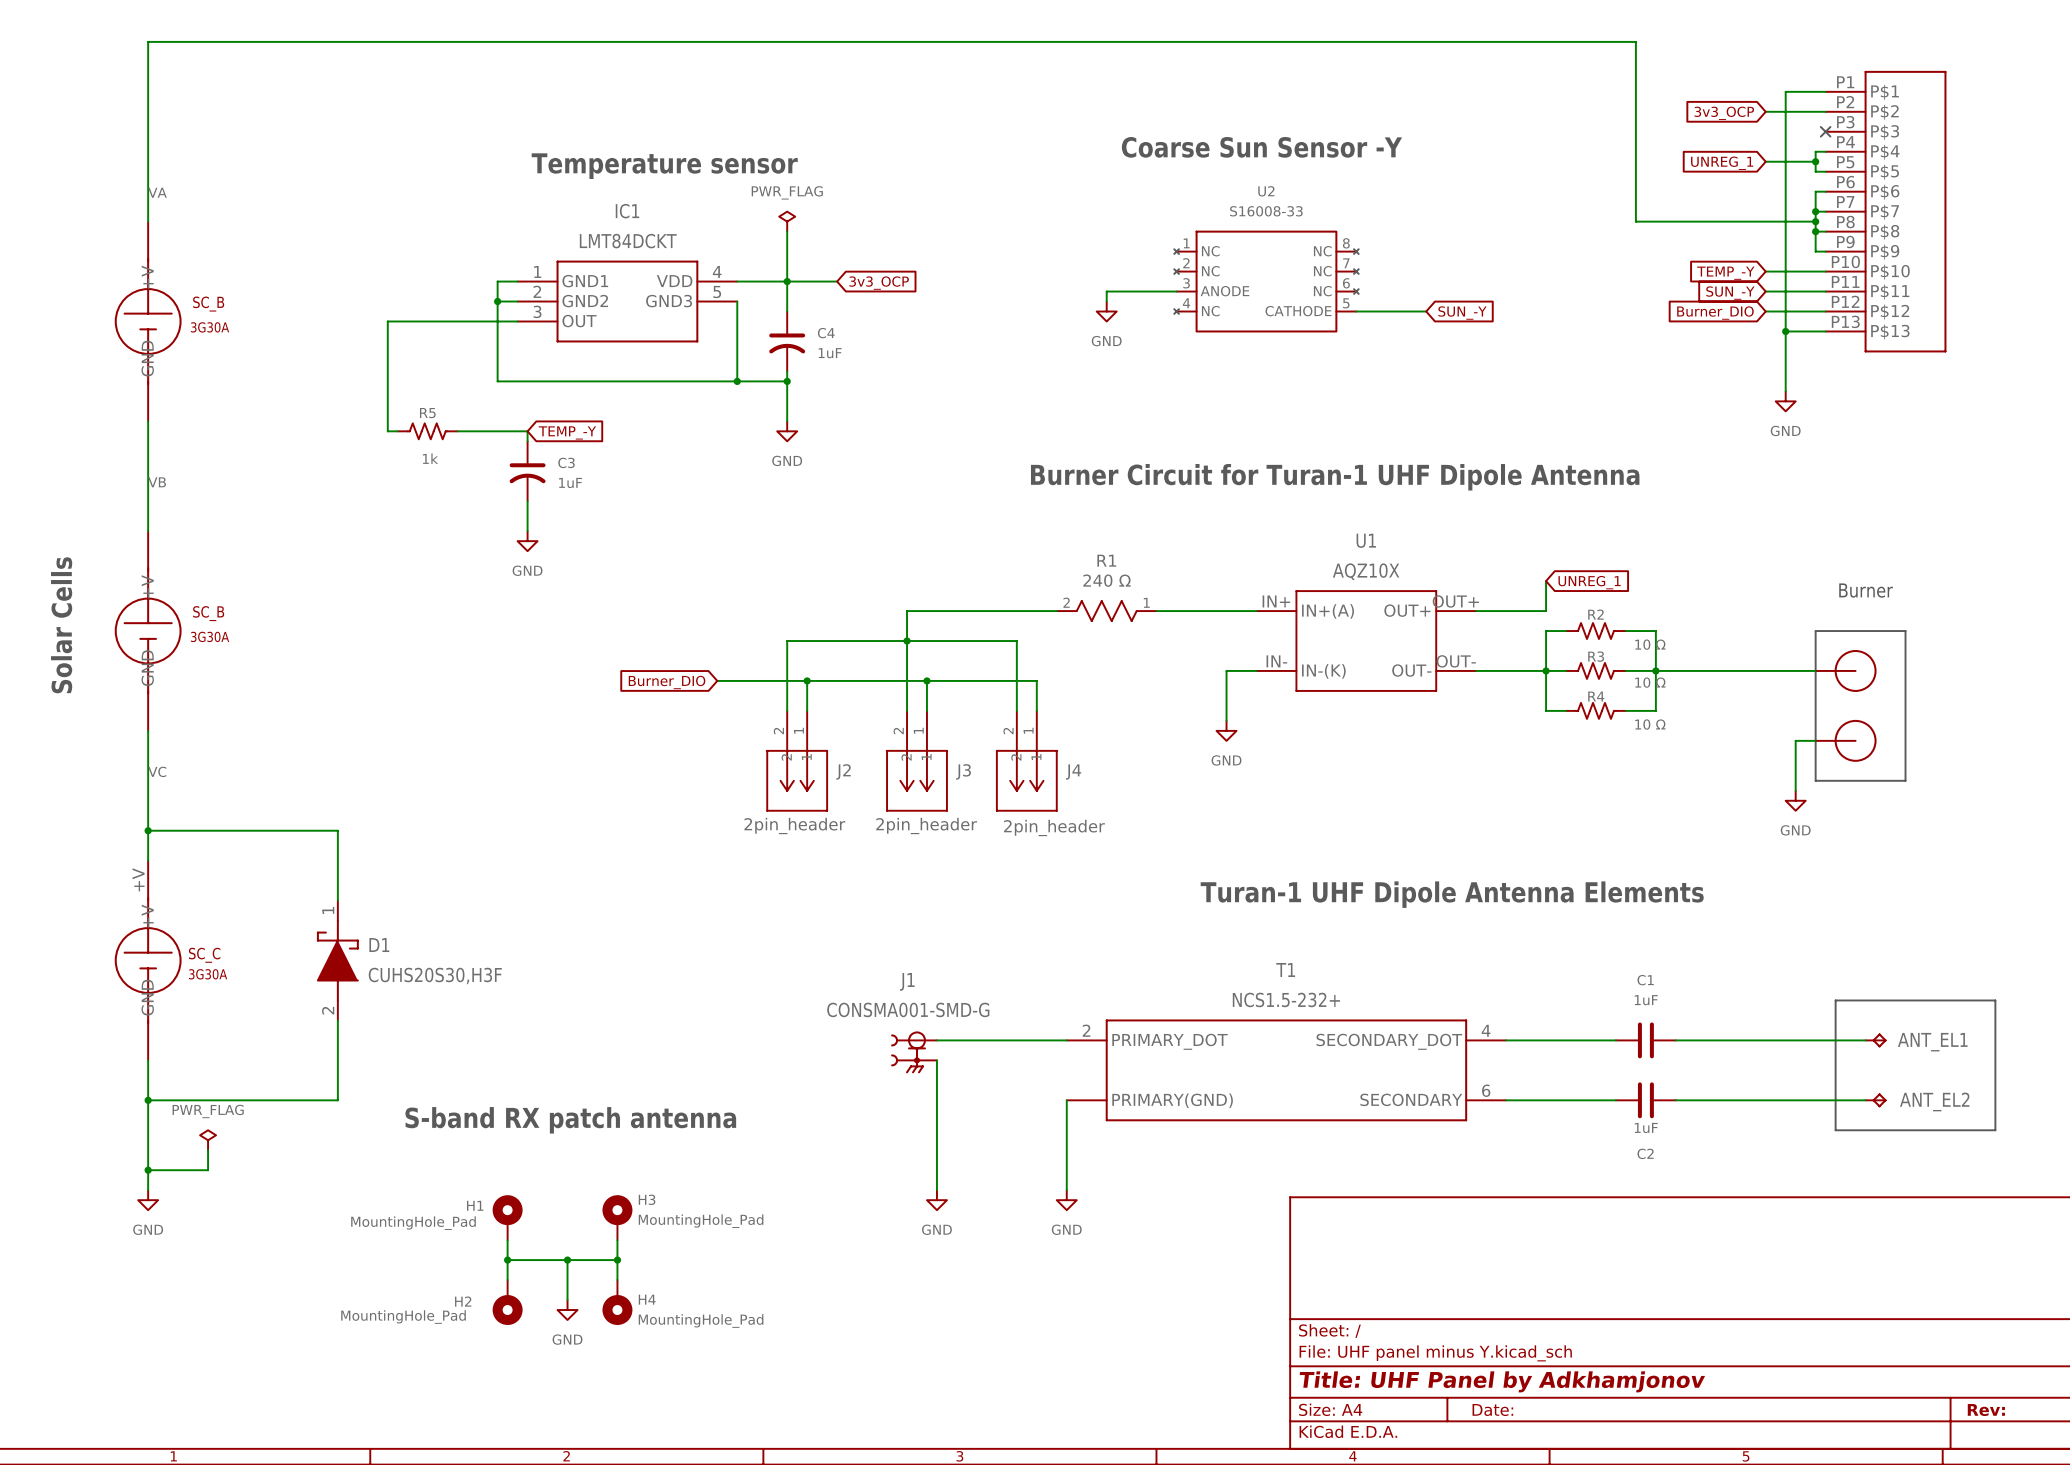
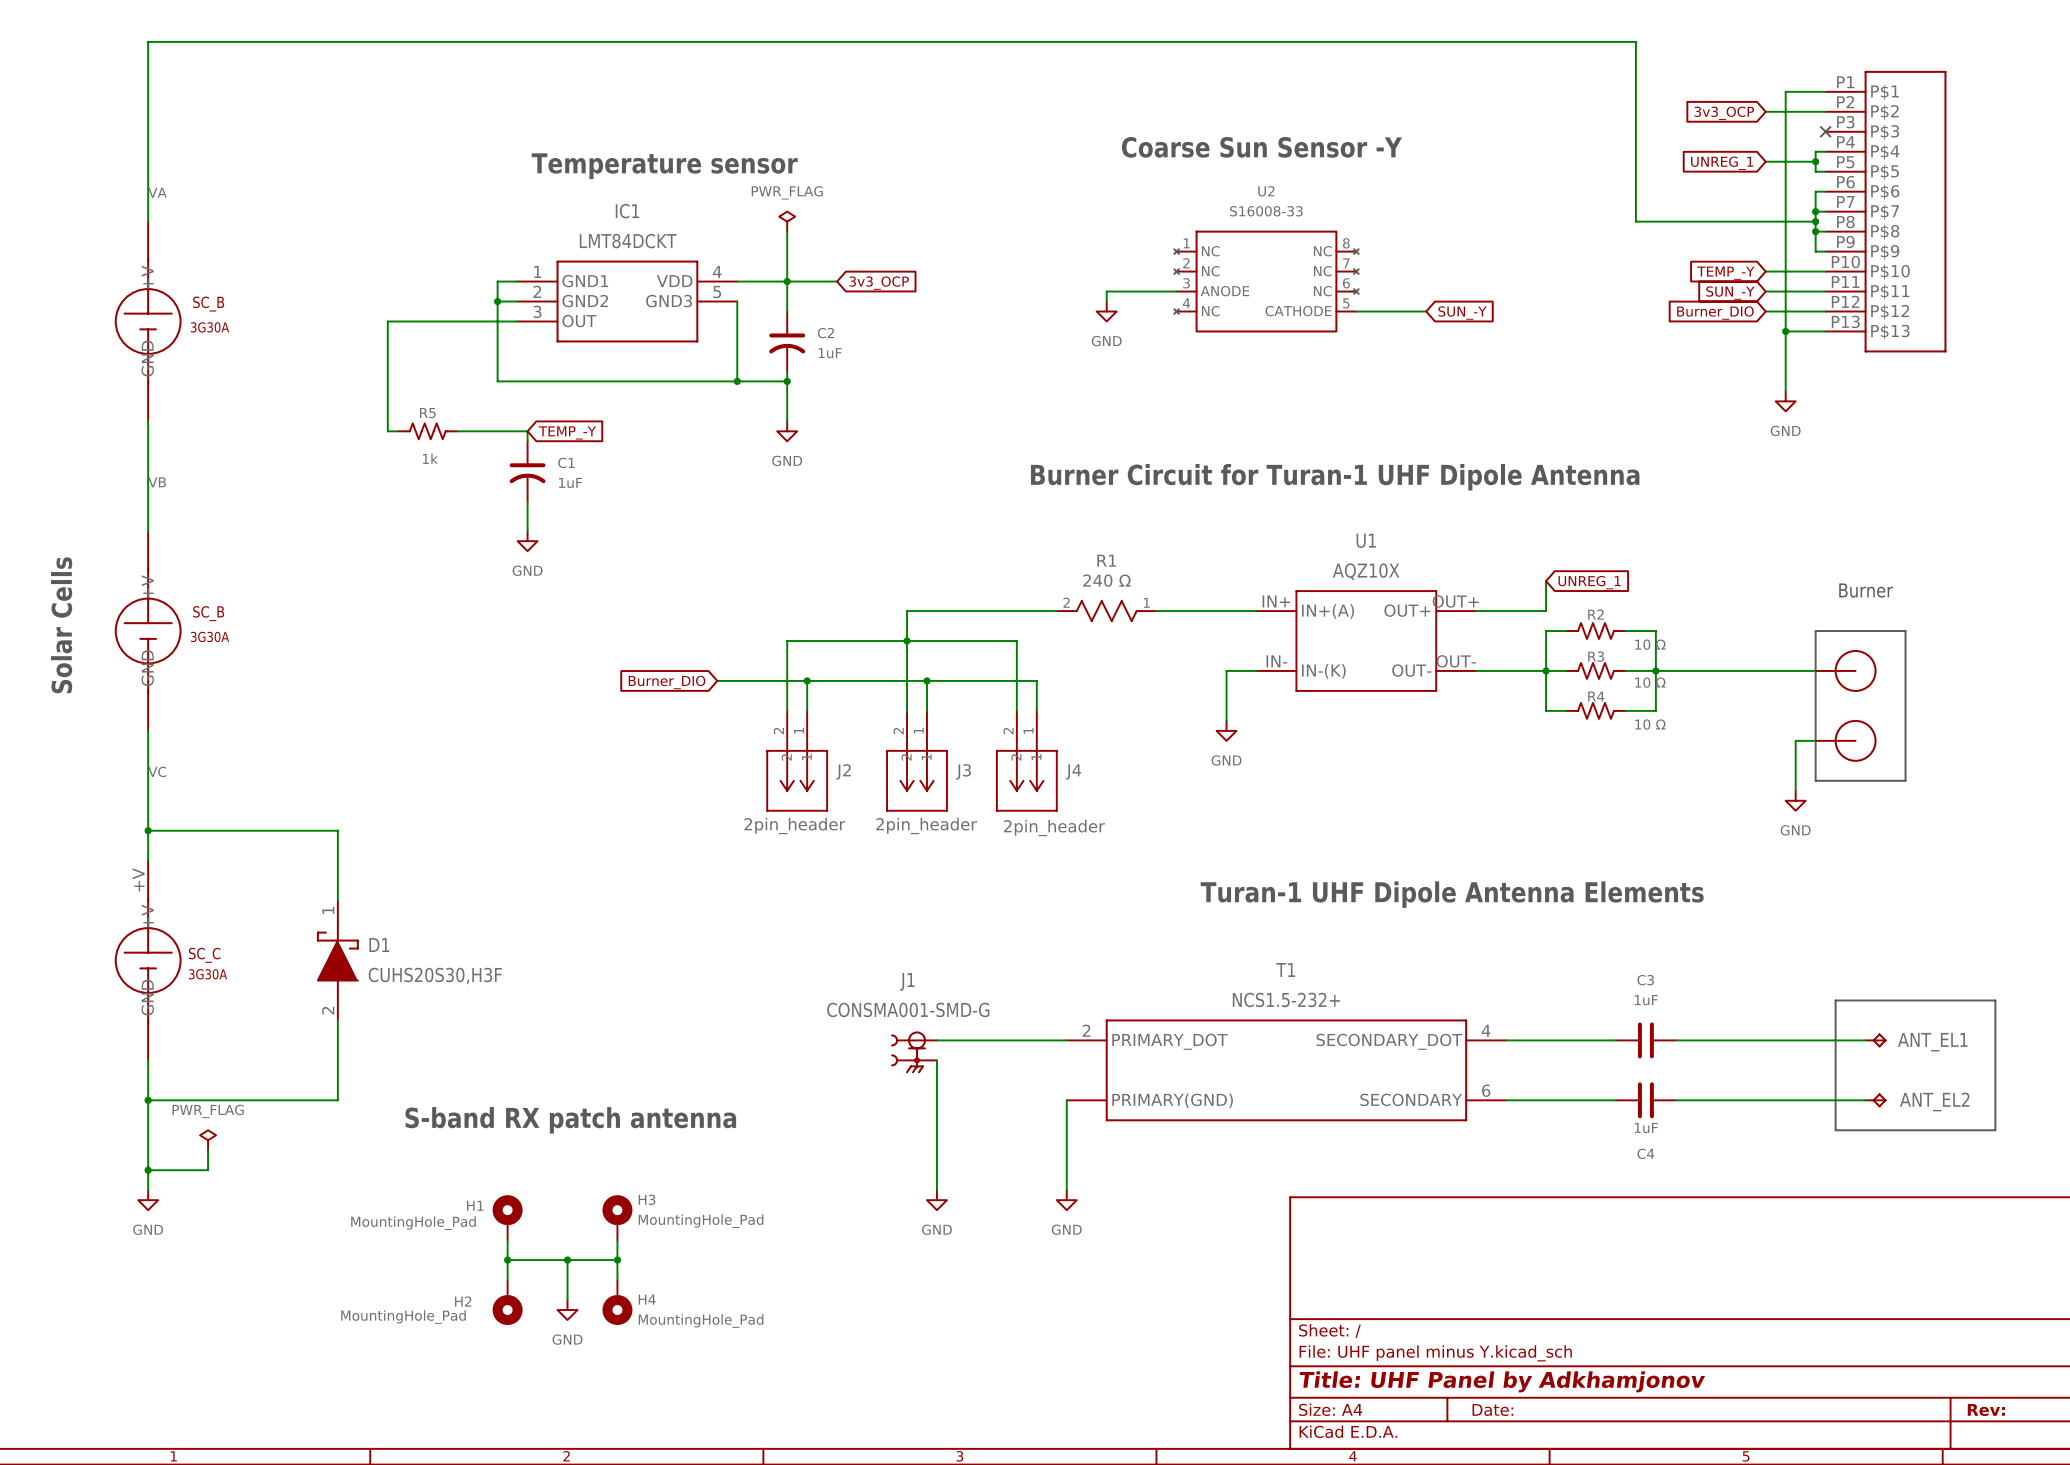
C4 name: C4 (826, 333) -> C2 (825, 333)
C3 name: C3 (566, 462) -> C1 (566, 462)
C1 name: C1 (1645, 980) -> C3 (1645, 980)
C2 name: C2 (1645, 1153) -> C4 (1645, 1153)

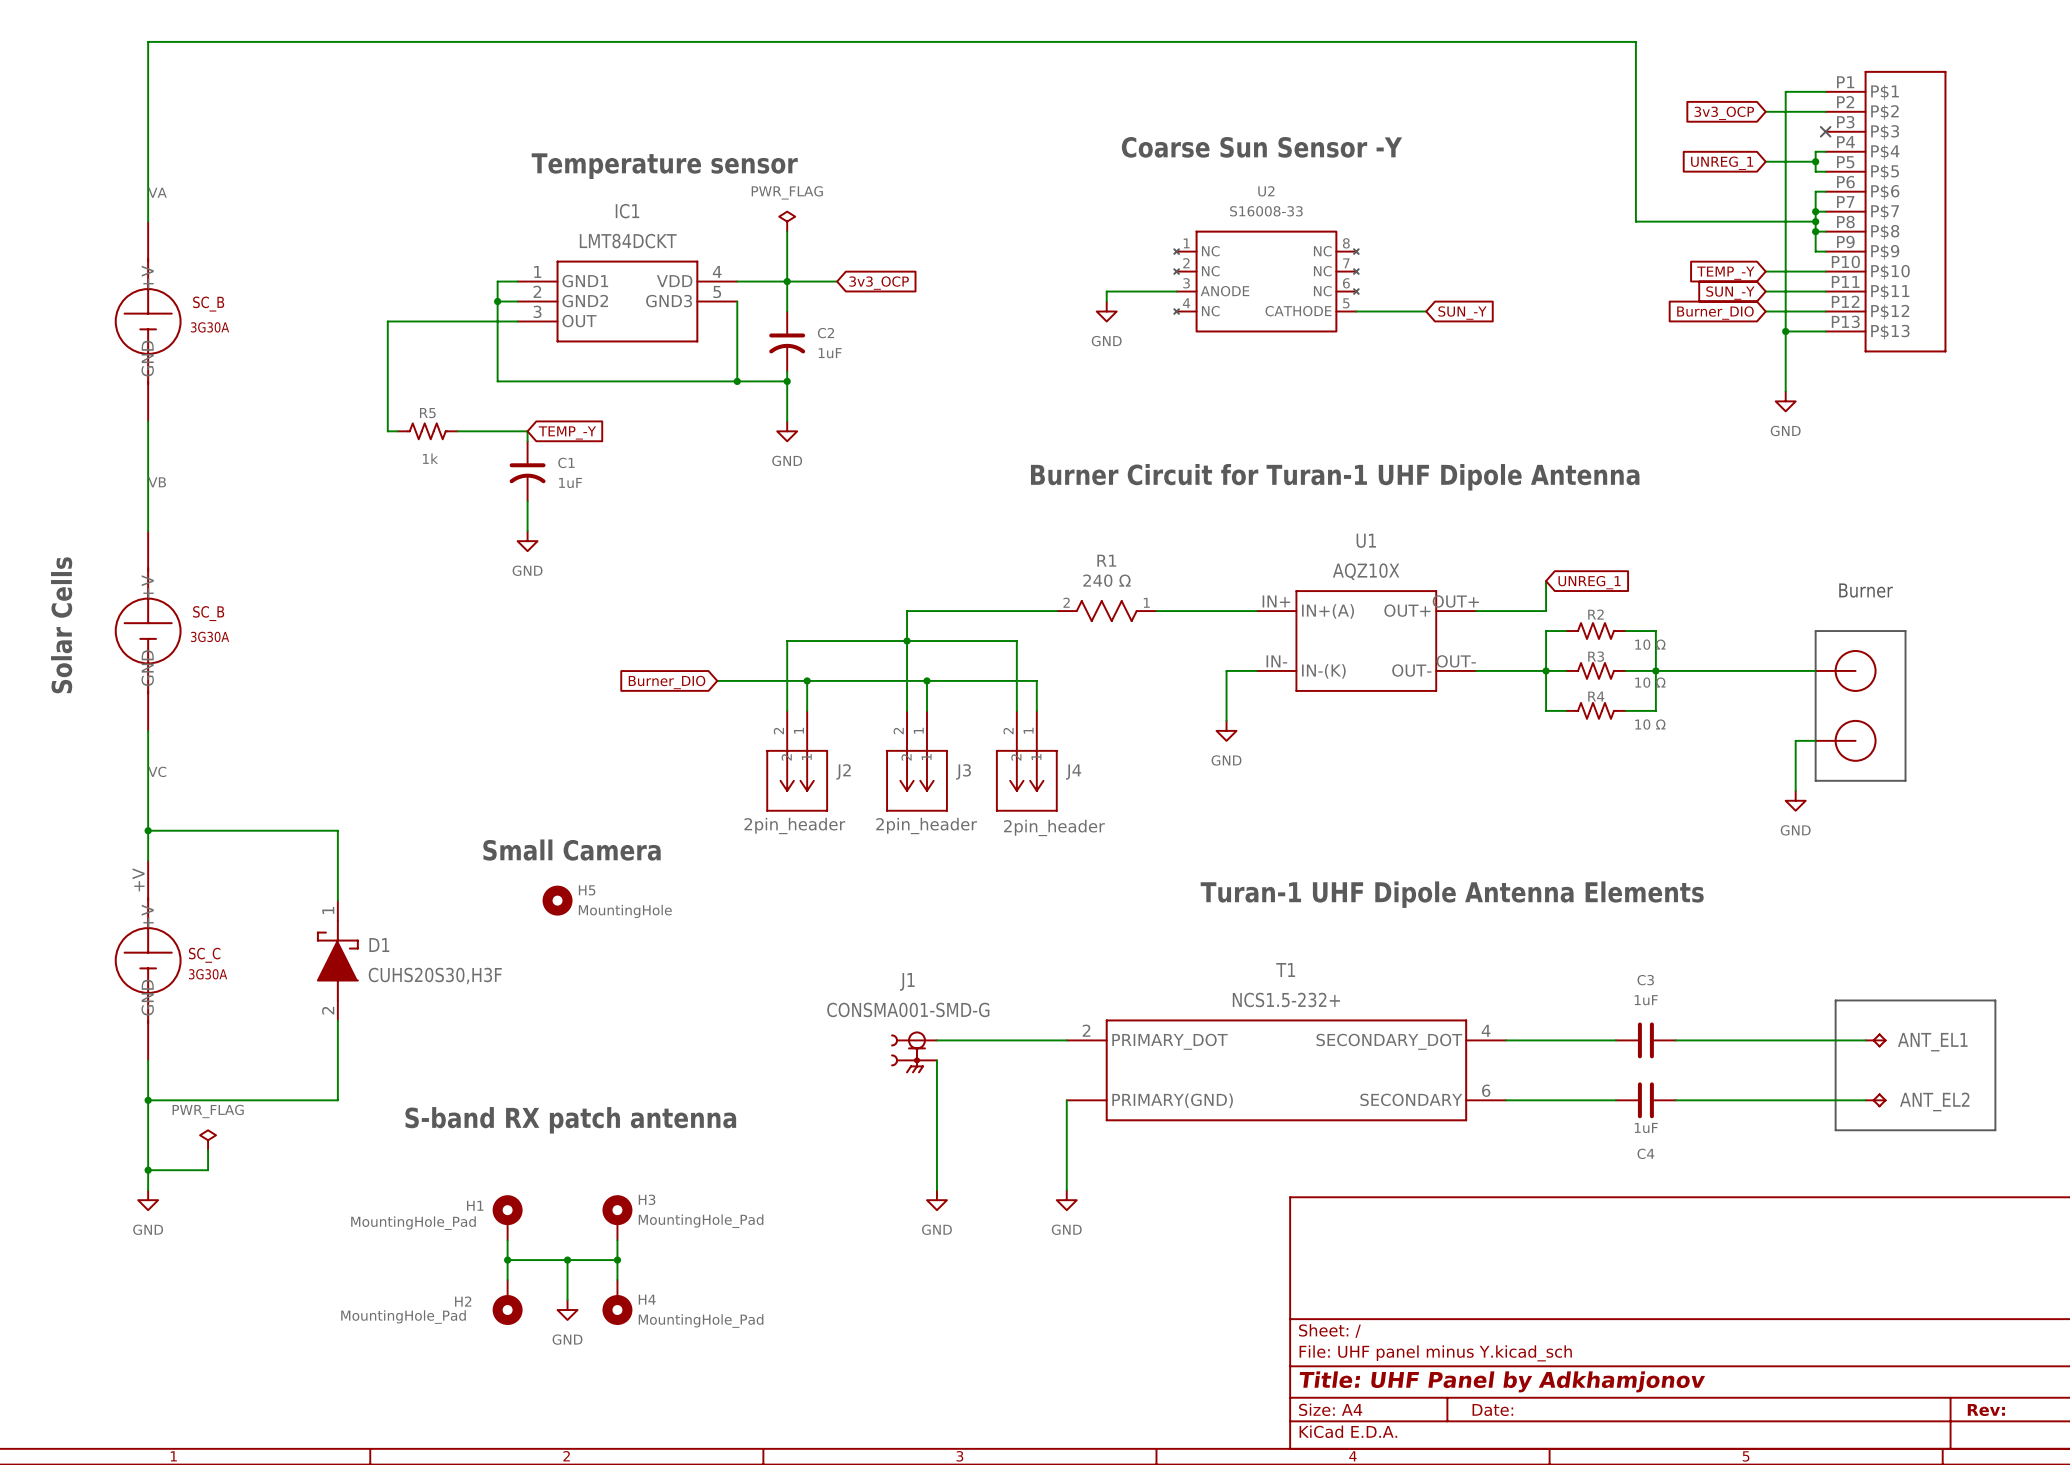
text: none -> Small Camera (572, 850)
H5: none -> MountingHole (557, 900)

